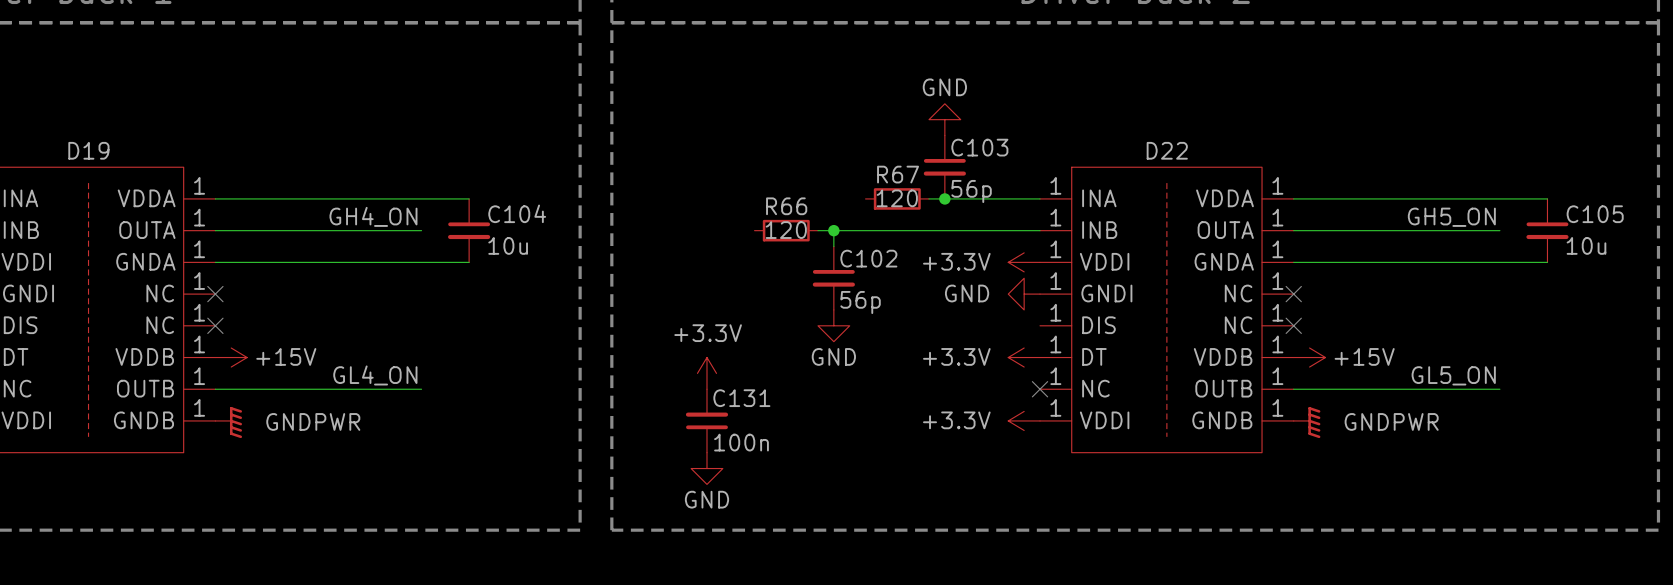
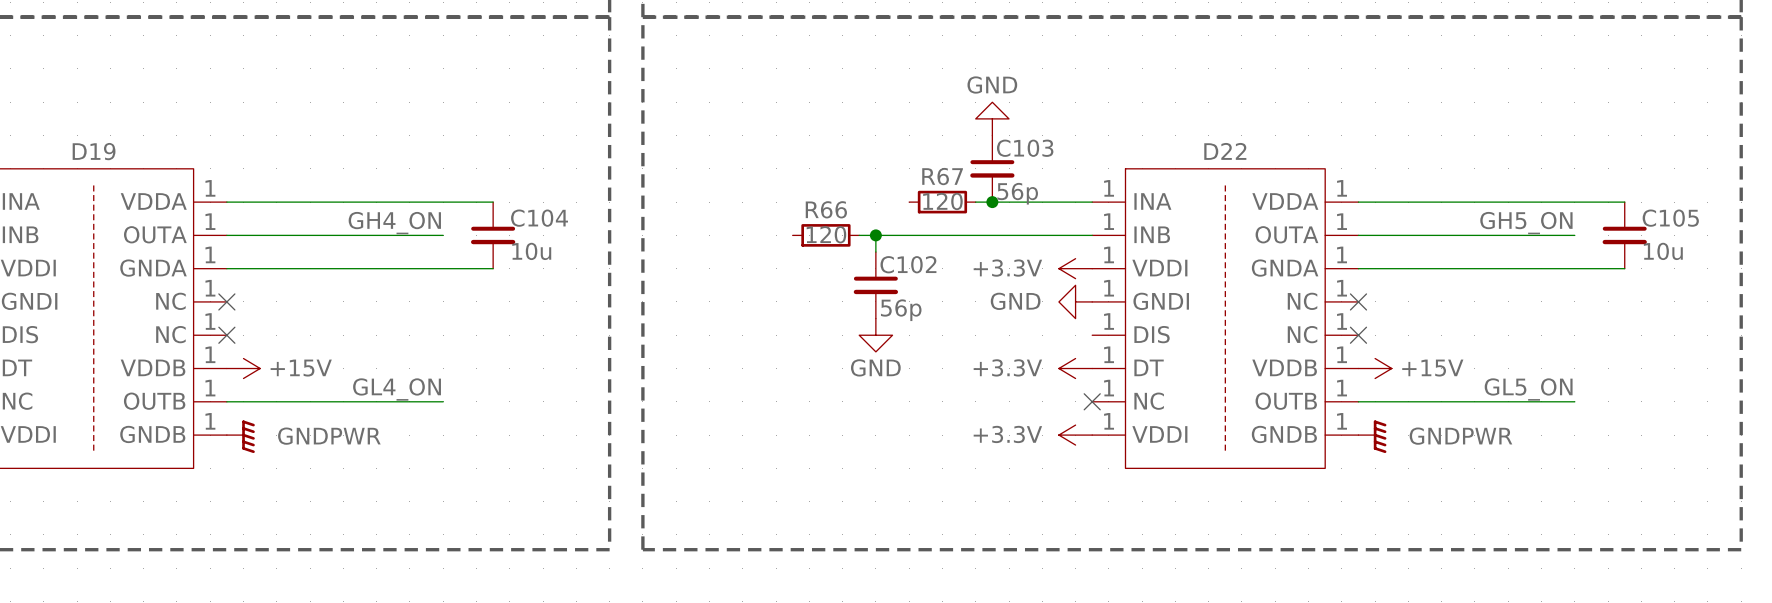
power symbol: +3.3V (706, 373) -> none
C131: 100n (706, 420) -> none
power symbol: GND (706, 468) -> none

